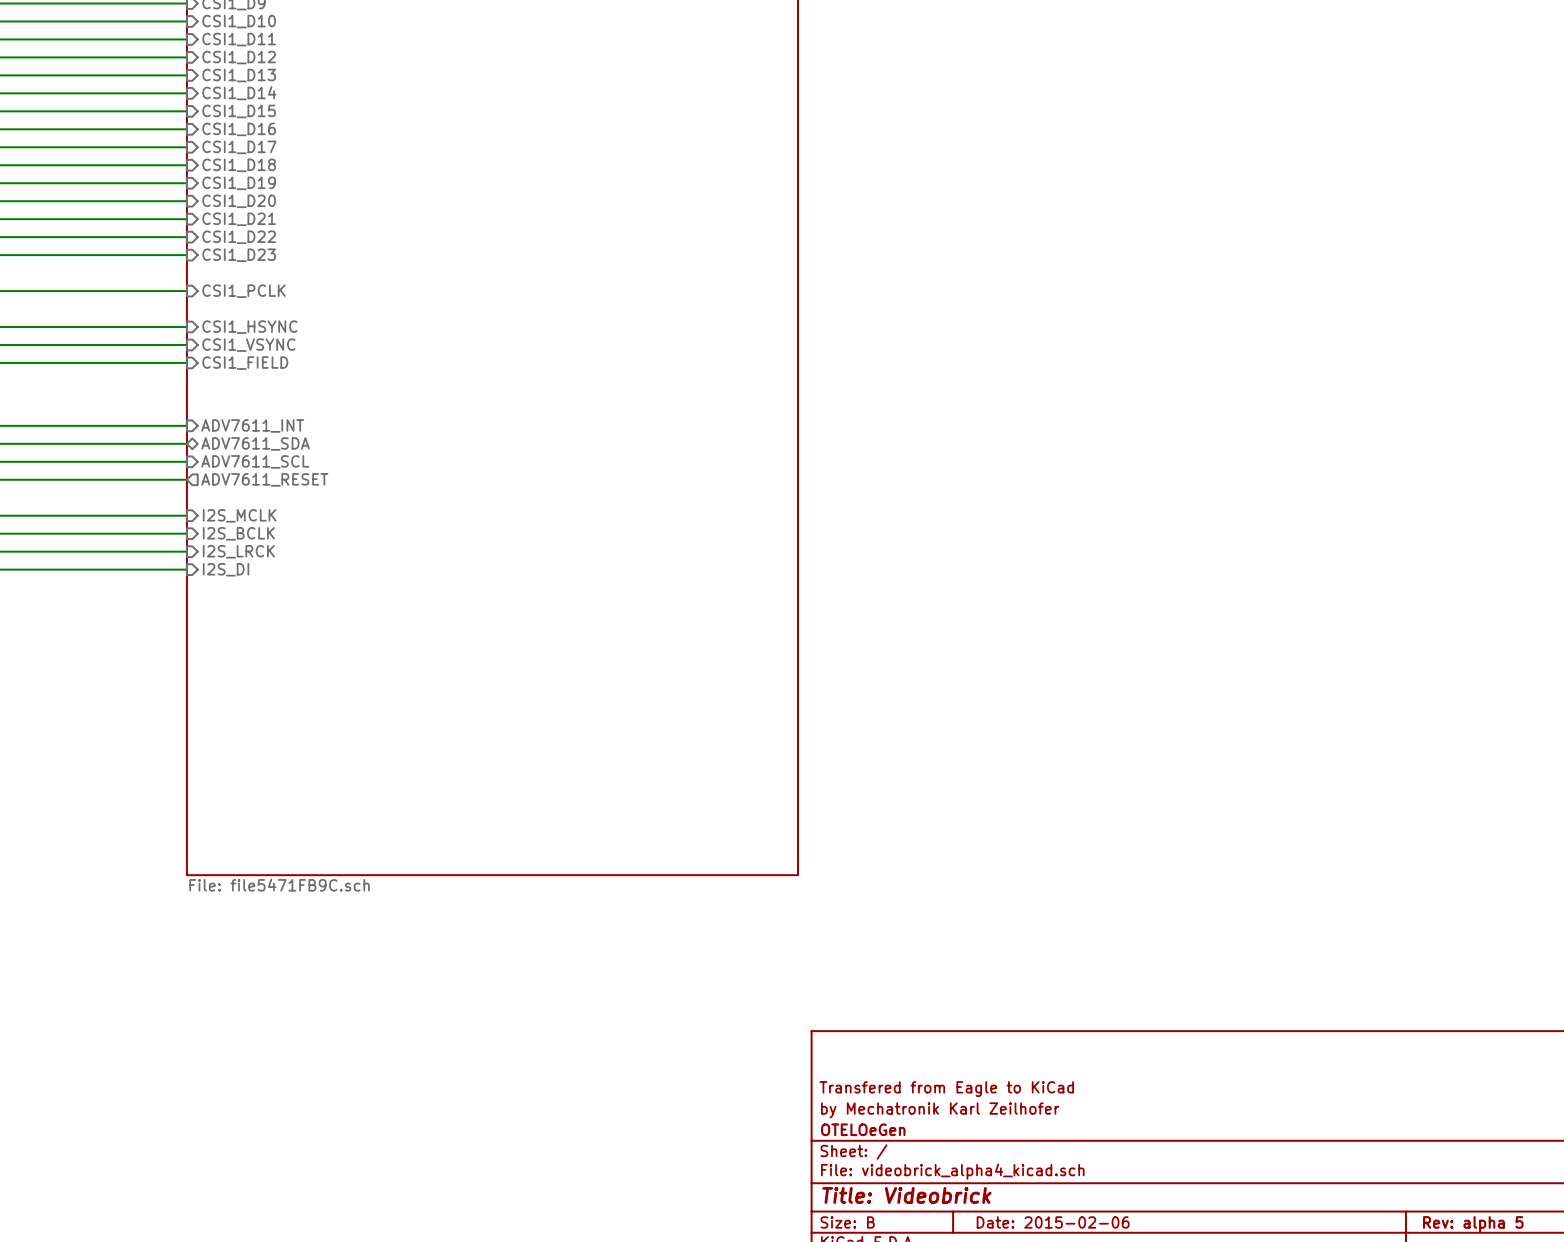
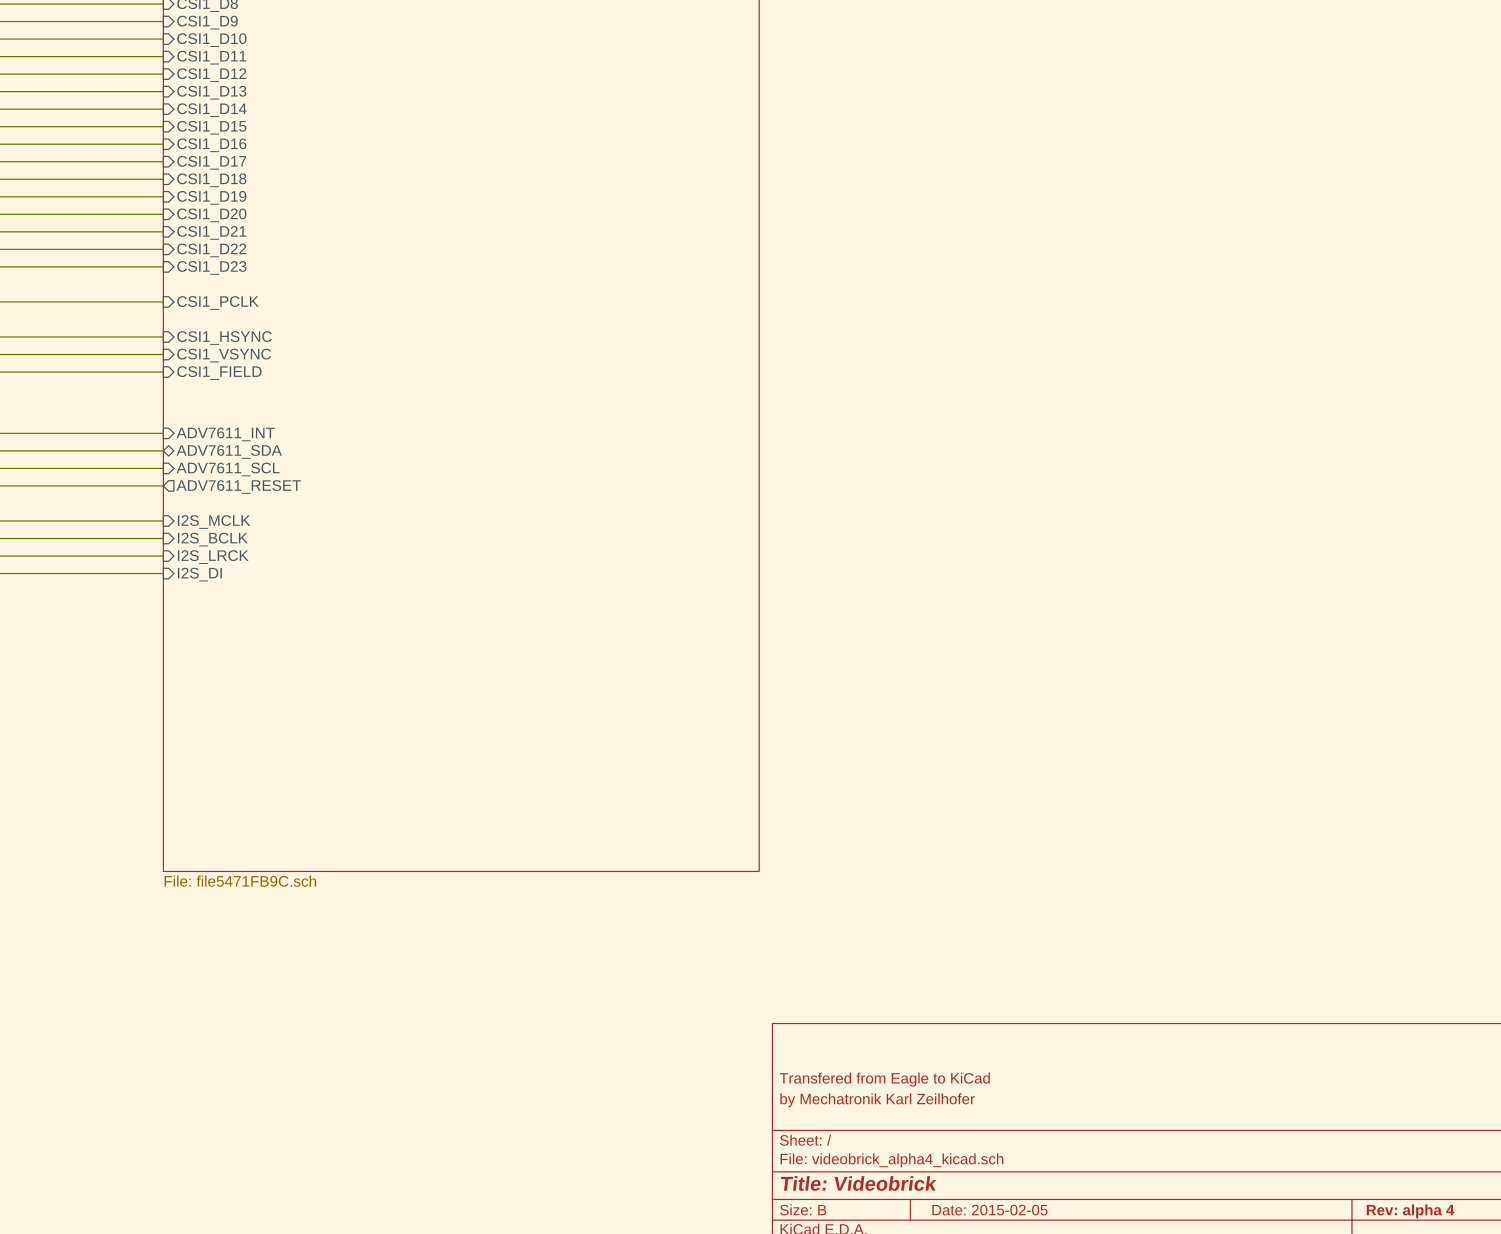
title block: OTELOeGen (863, 1129) -> none
title block: Date: 2015-02-06 (1053, 1222) -> Date: 2015-02-05 (989, 1210)
title block: Rev: alpha 5 (1473, 1224) -> Rev: alpha 4 (1410, 1211)

